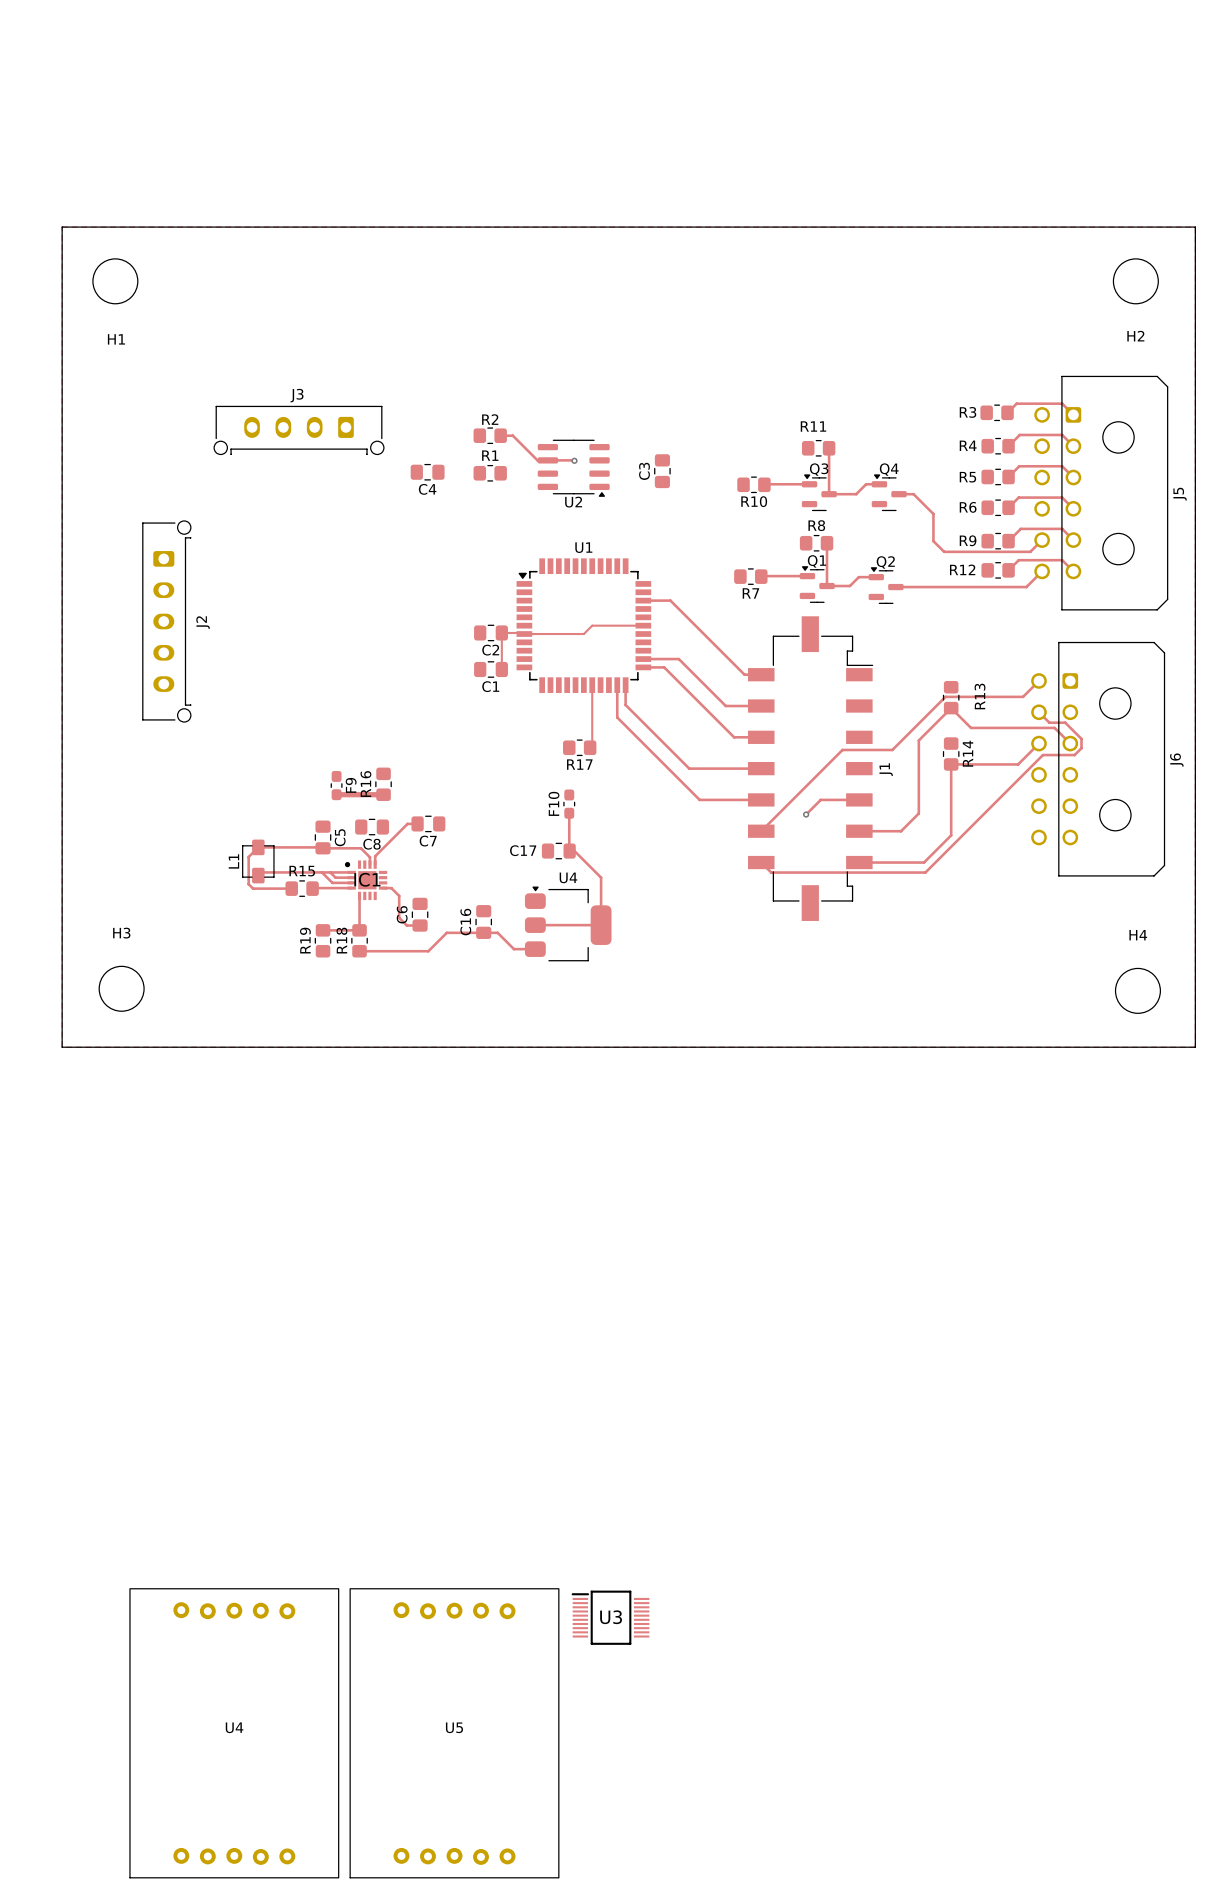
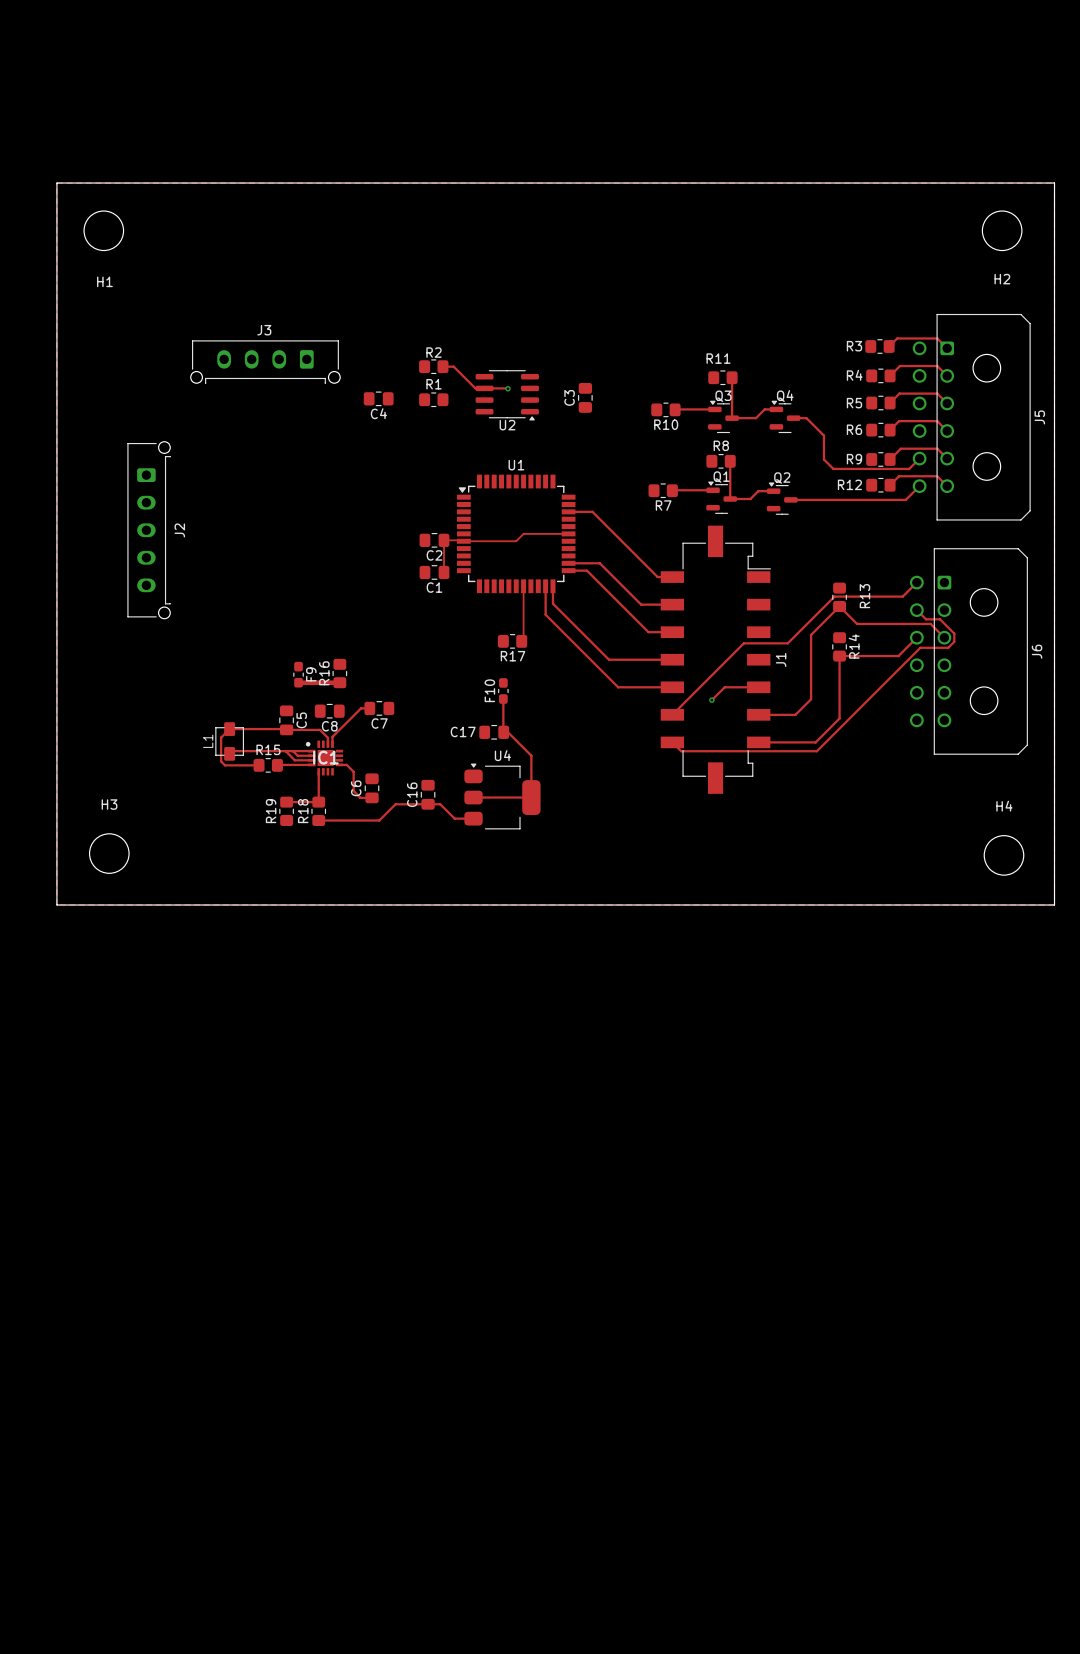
U3: (610, 1617) -> none
U4: (234, 1733) -> none
U5: (454, 1733) -> none

